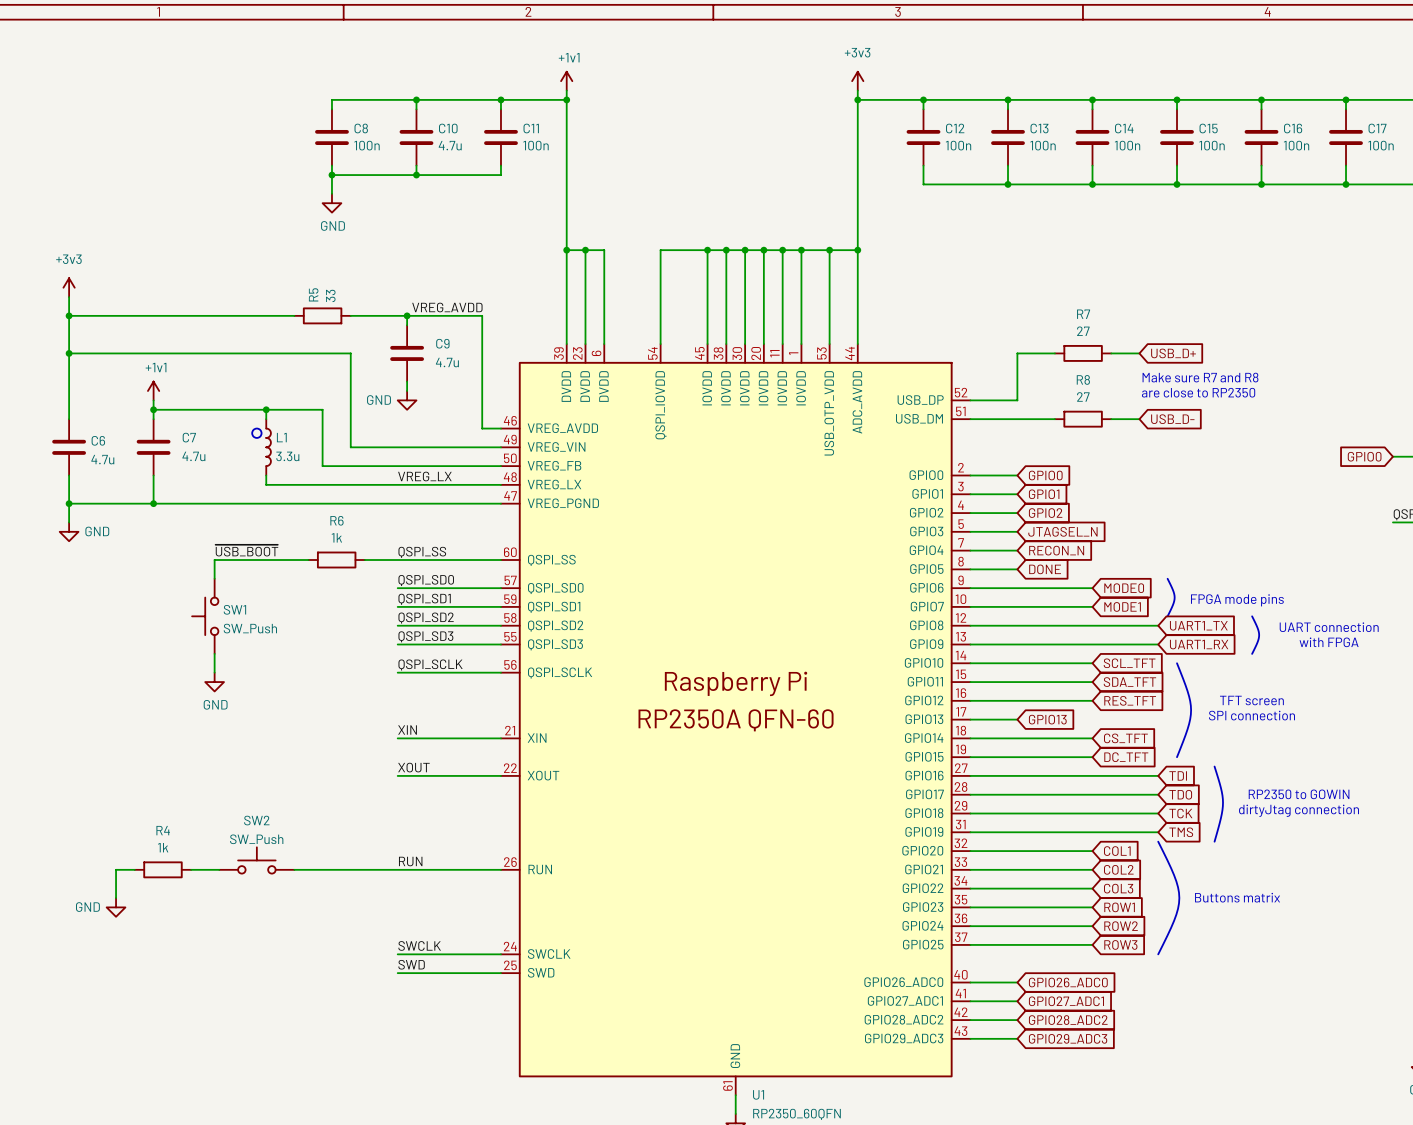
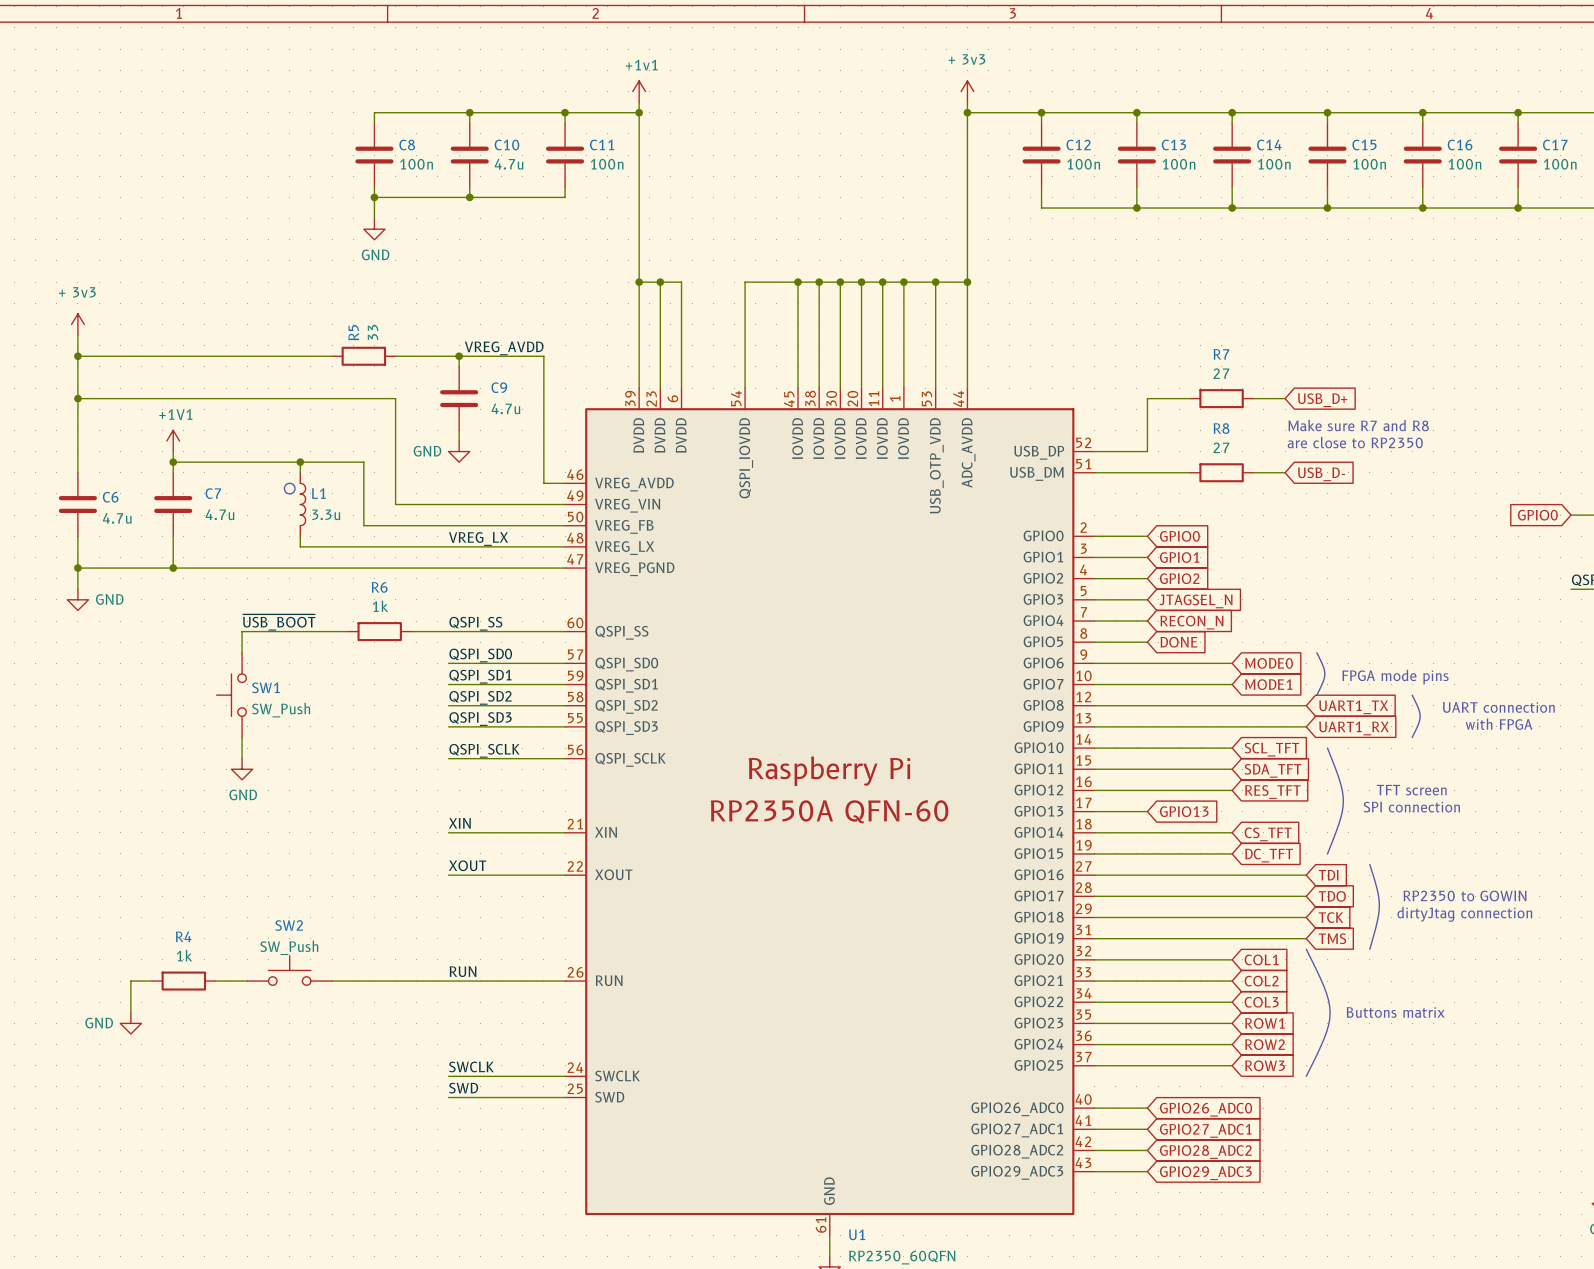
power symbol: +3v3 (857, 81) -> + 3v3 (967, 91)
power symbol: +3v3 (69, 287) -> + 3v3 (77, 324)
power symbol: +1v1 (153, 390) -> +1V1 (173, 440)

